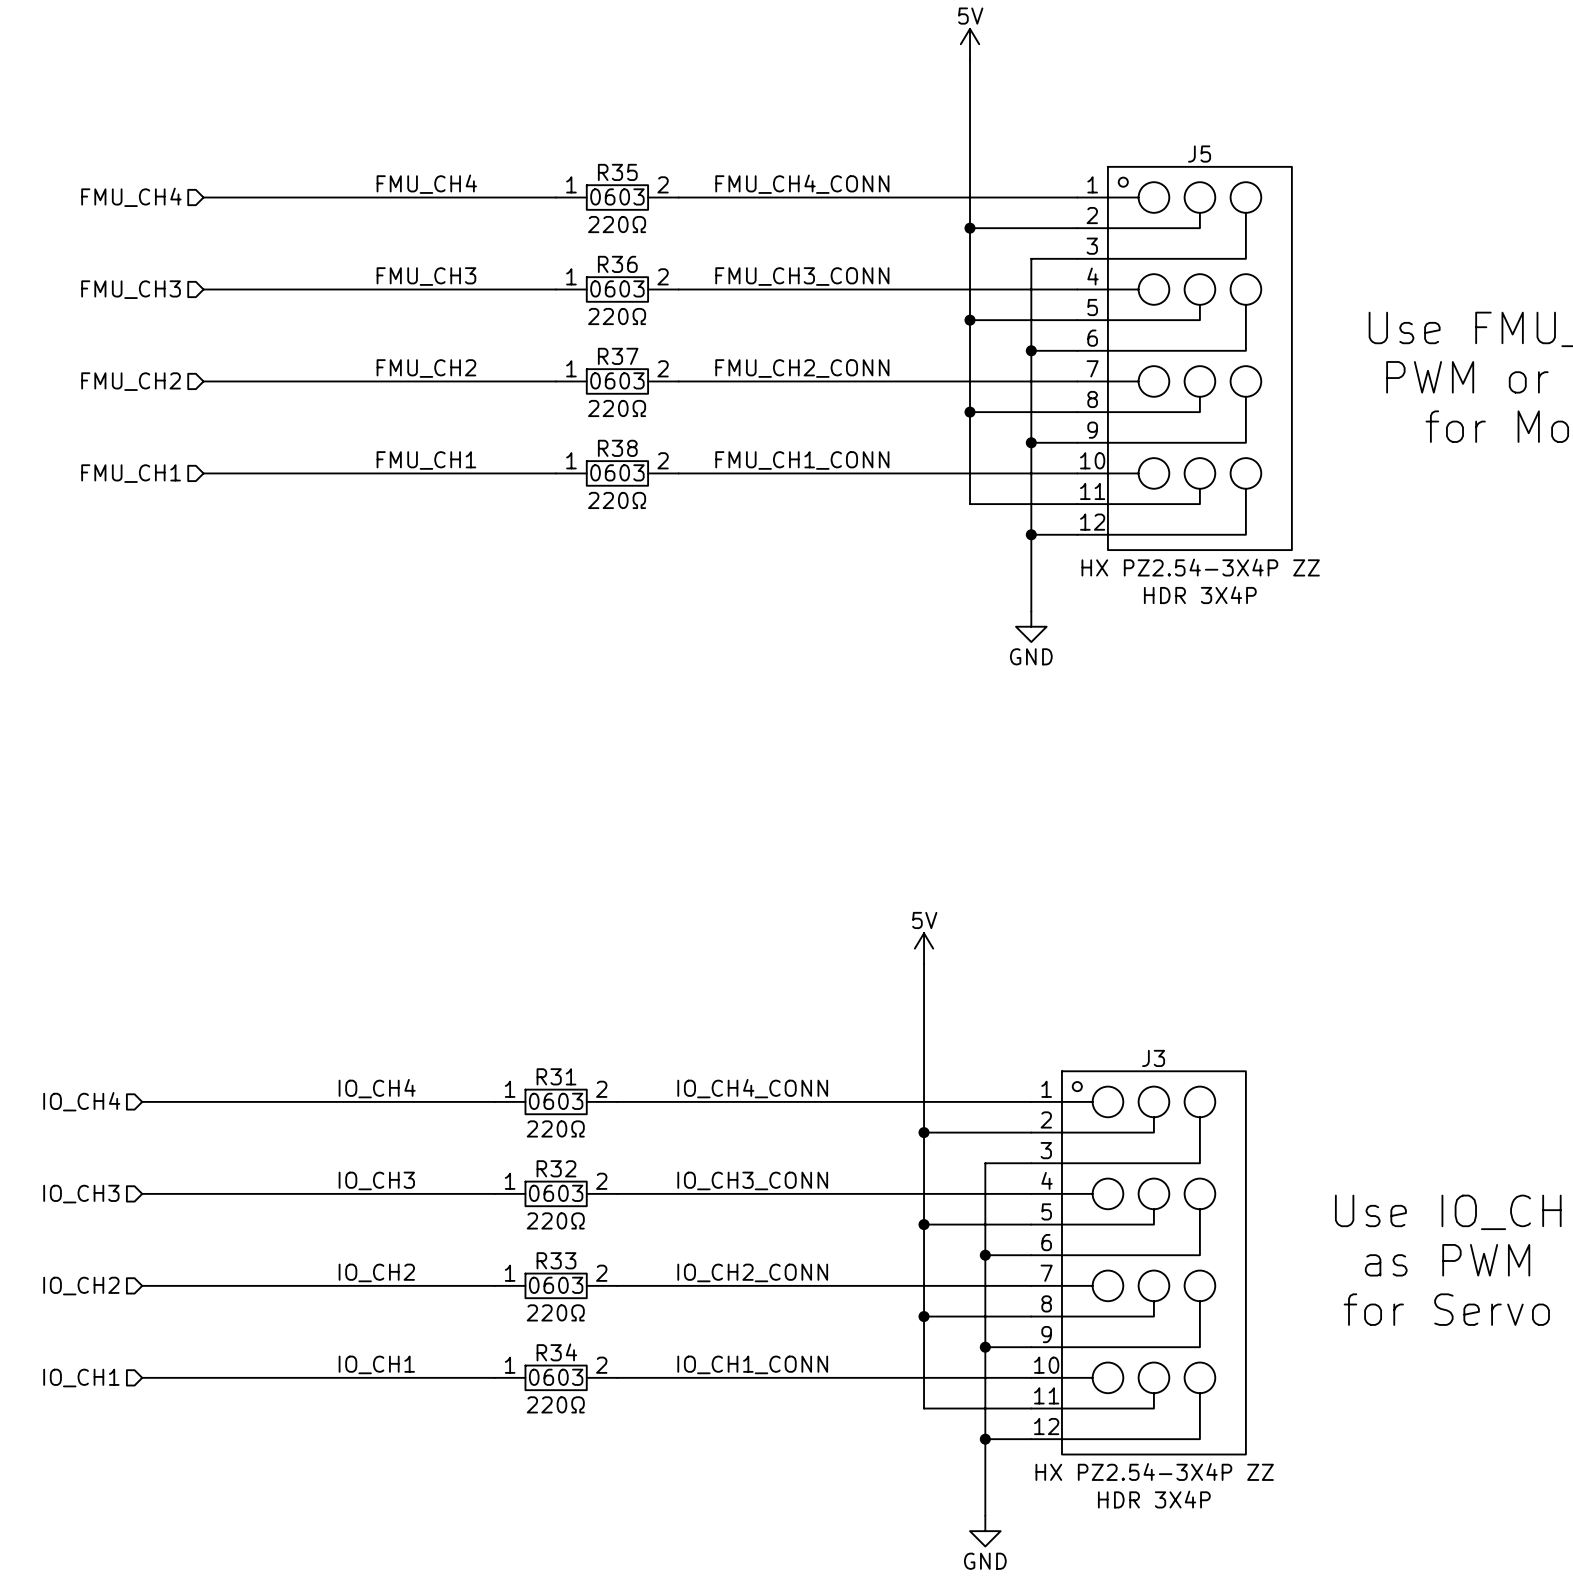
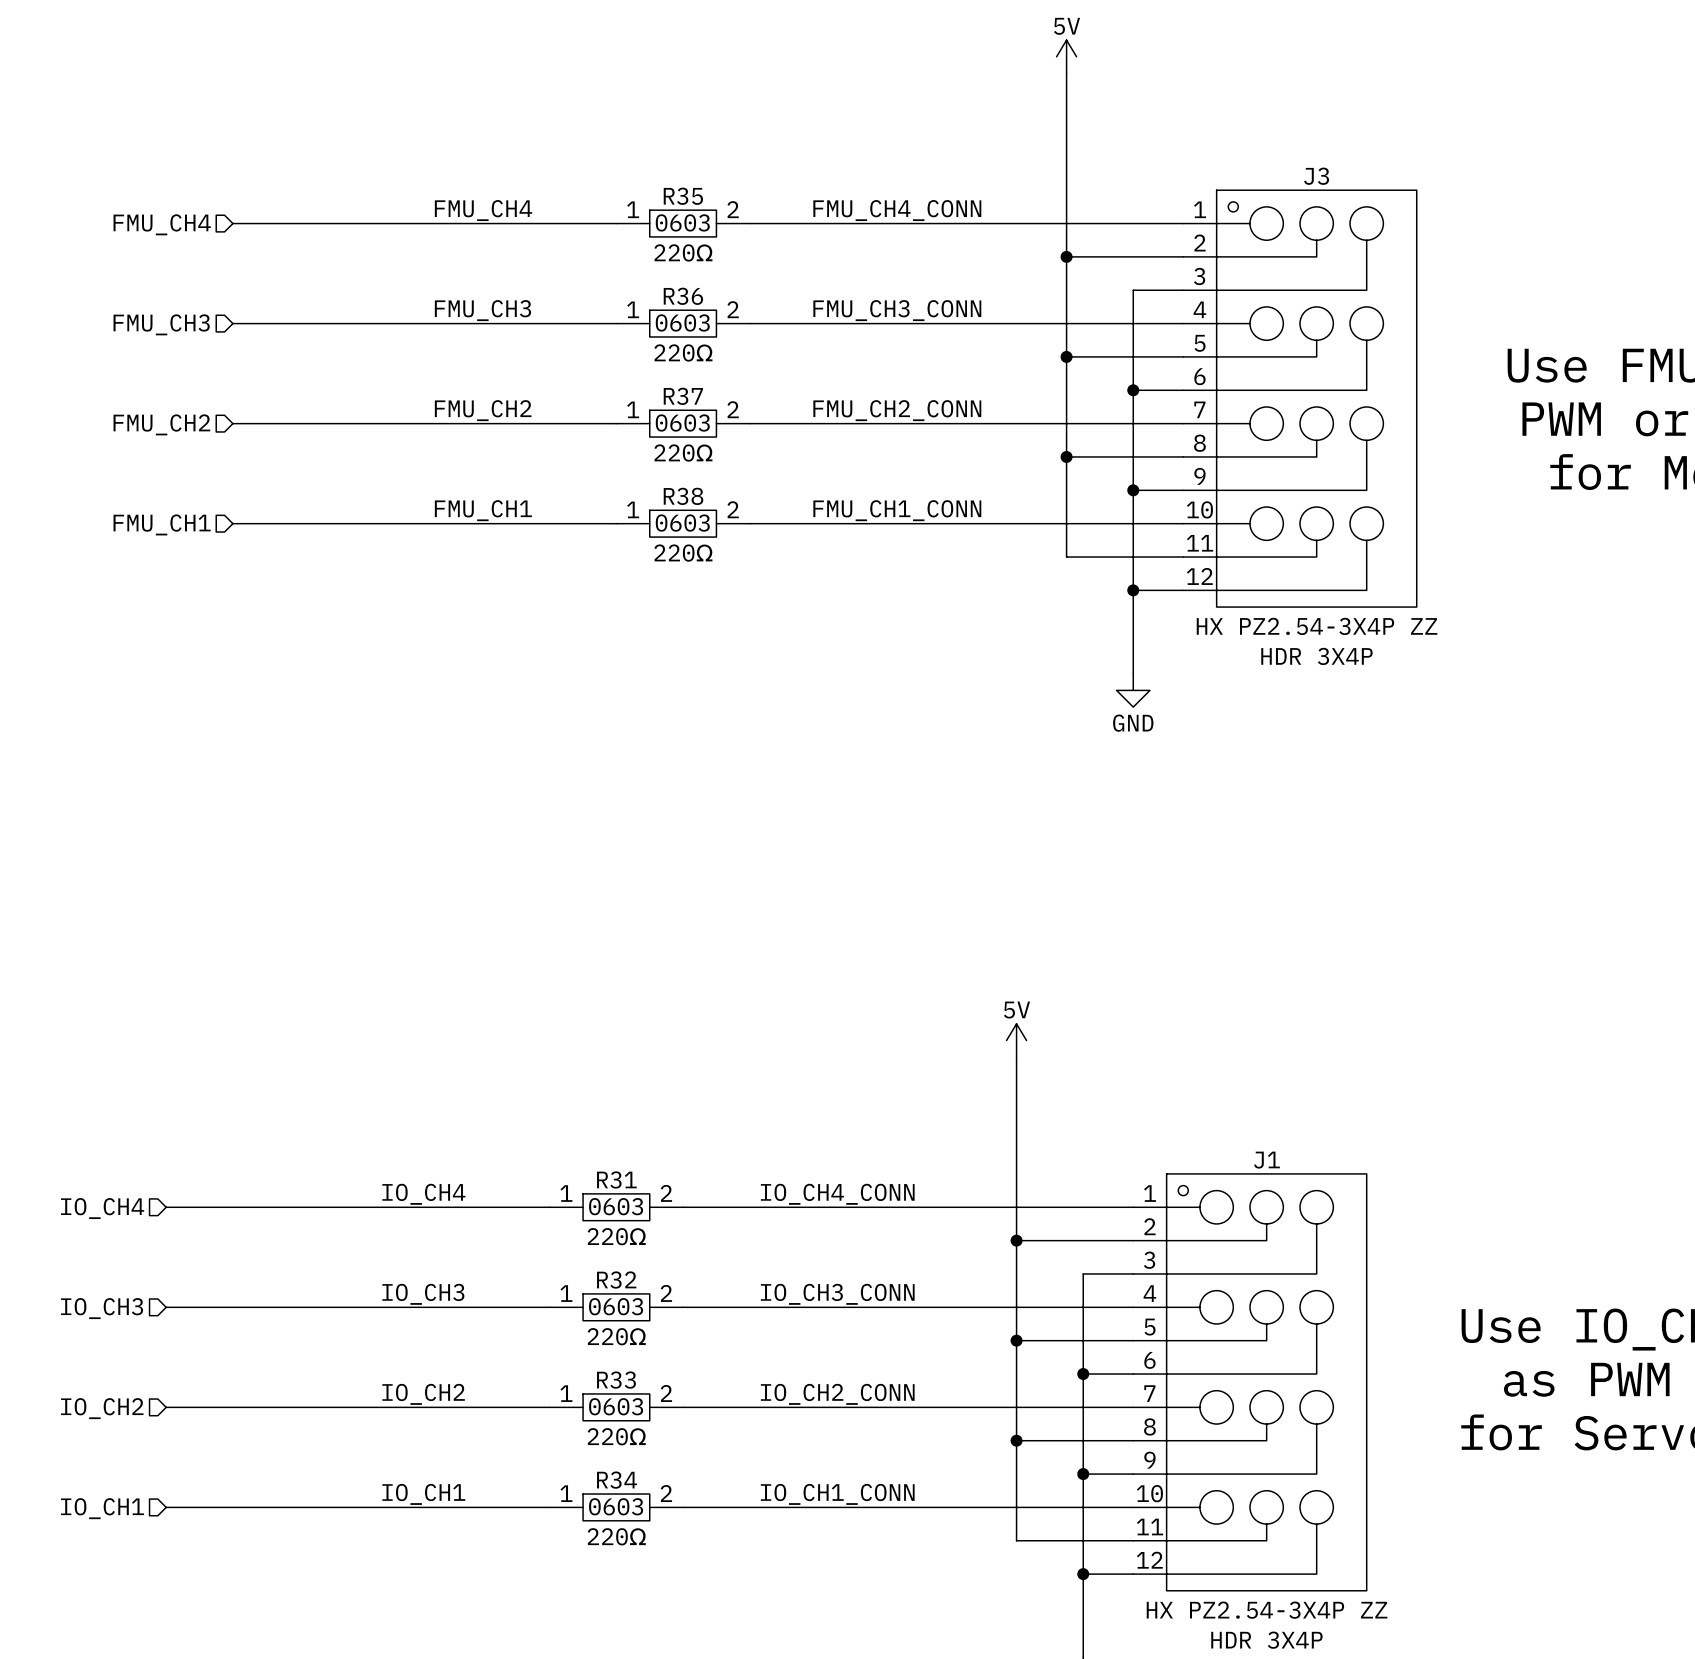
J5 name: J5 (1199, 154) -> J3 (1316, 176)
J3 name: J3 (1153, 1058) -> J1 (1266, 1160)

